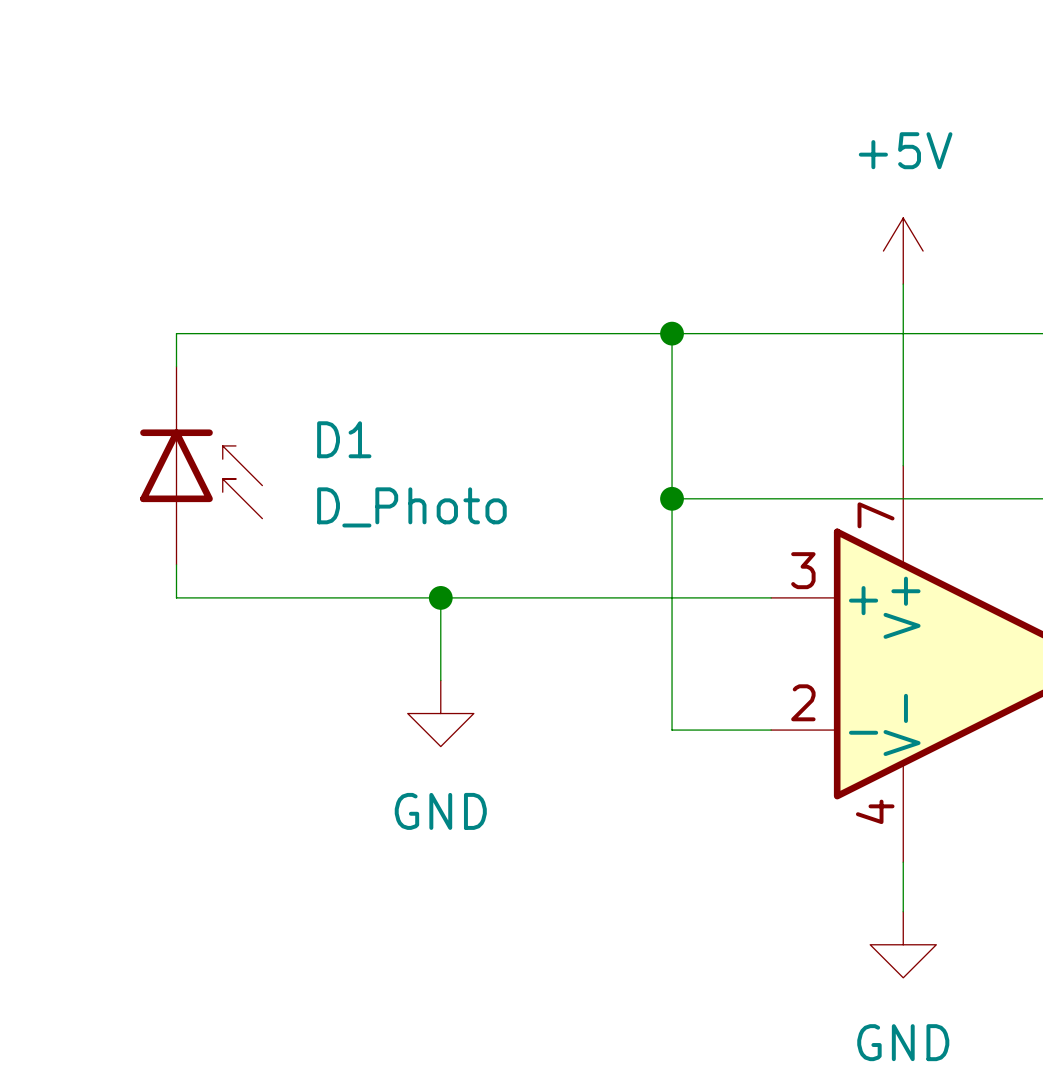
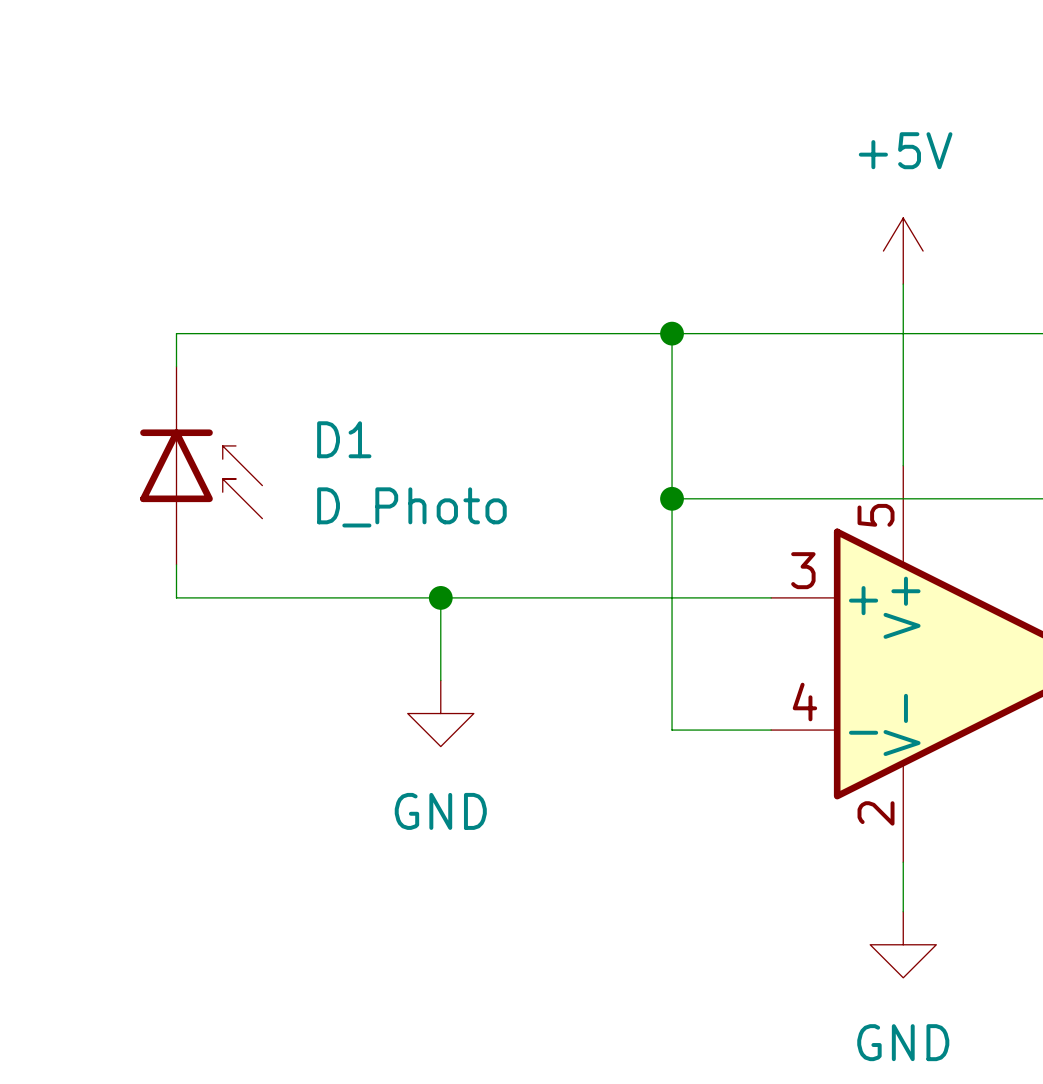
part pin number: 7 (876, 515) -> 5 (876, 515)
part pin number: 2 (803, 702) -> 4 (804, 702)
part pin number: 4 (875, 811) -> 2 (876, 813)

